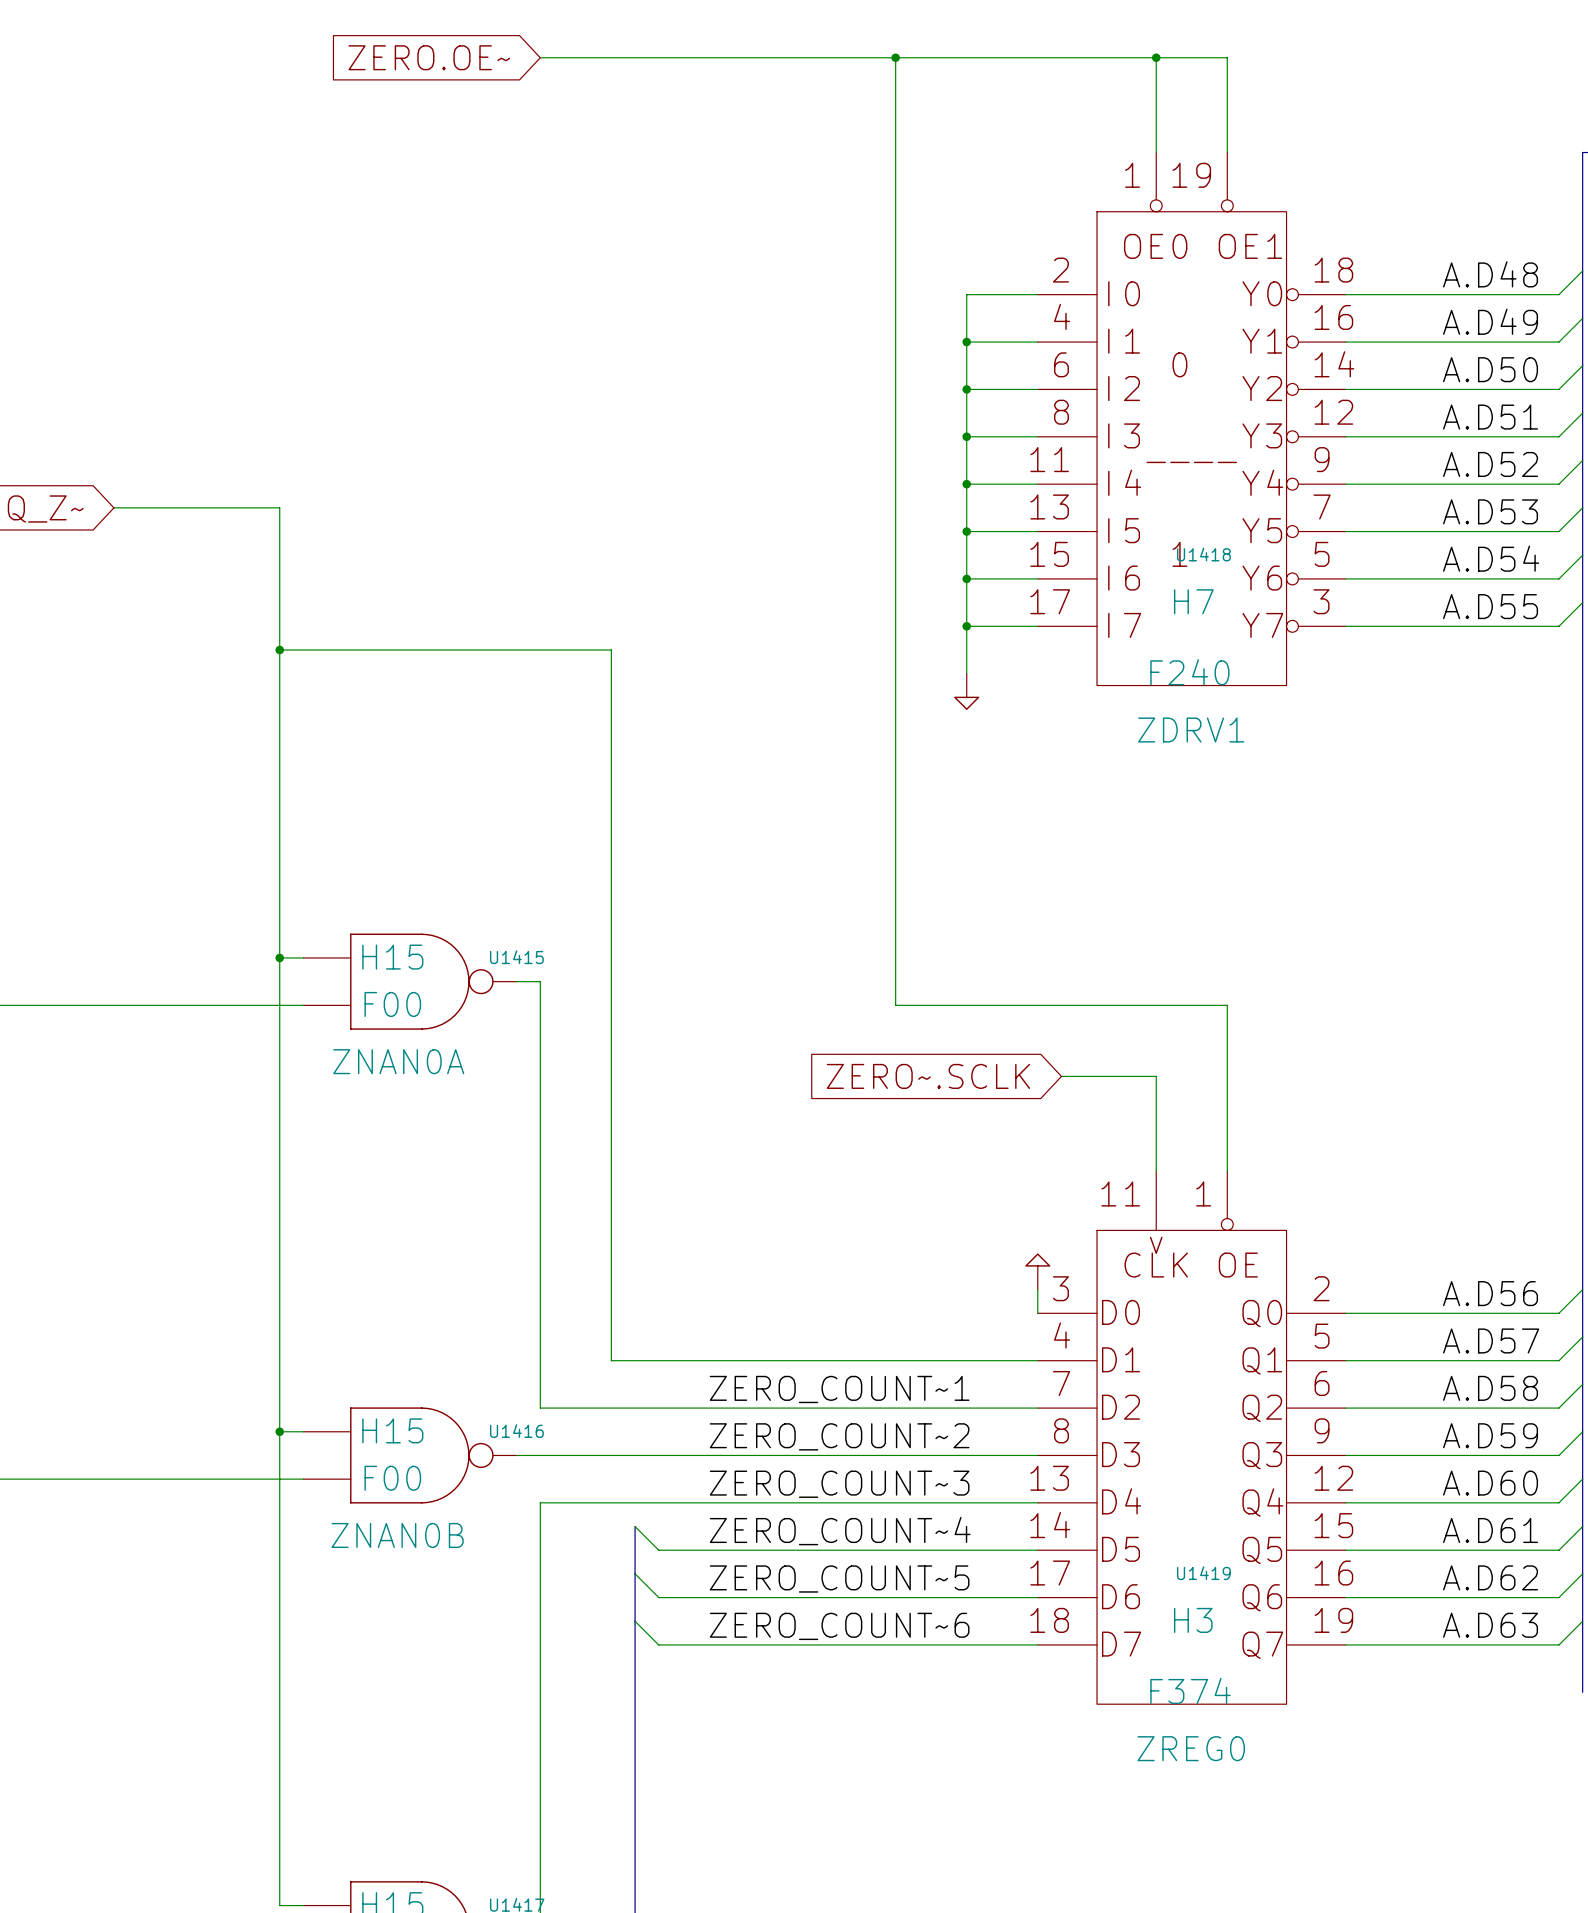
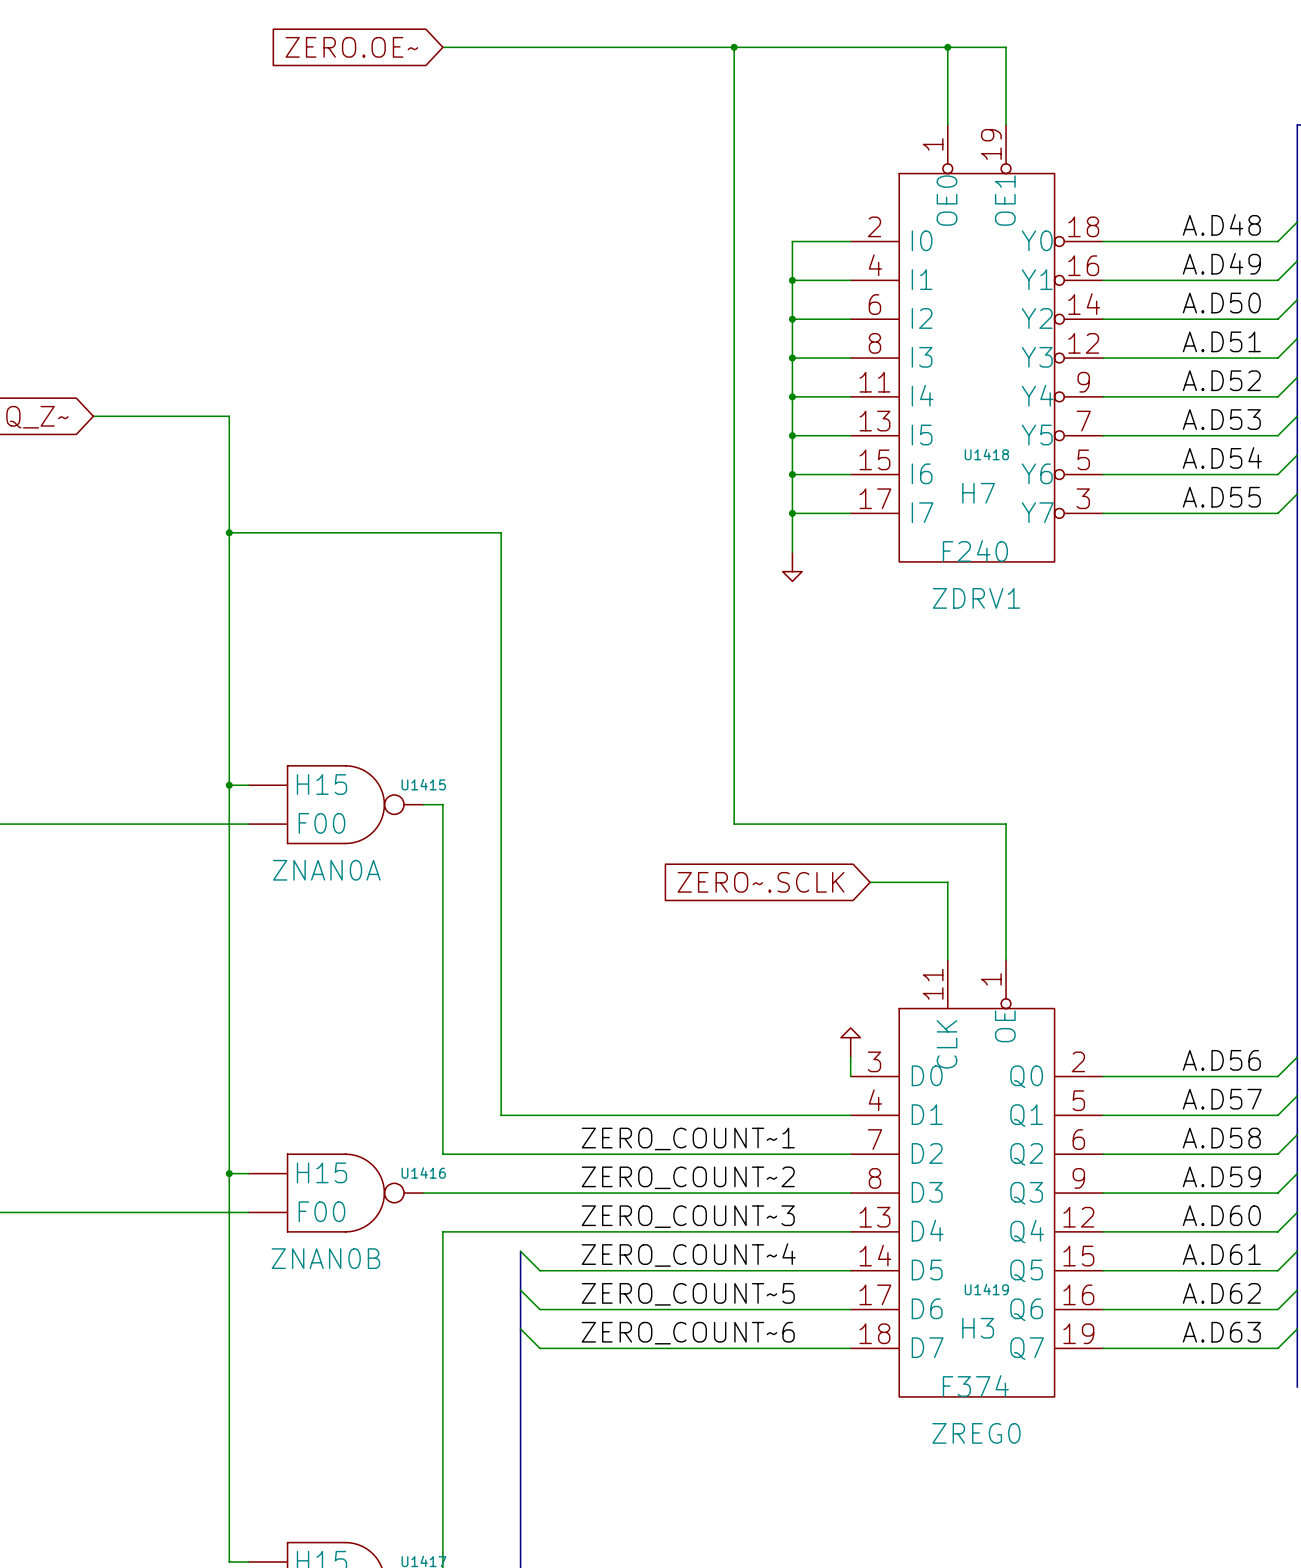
U1418 symbol: [1037, 152, 1346, 686] -> [850, 125, 1104, 562]
U1419 symbol: [1037, 1171, 1346, 1705] -> [850, 960, 1104, 1397]

